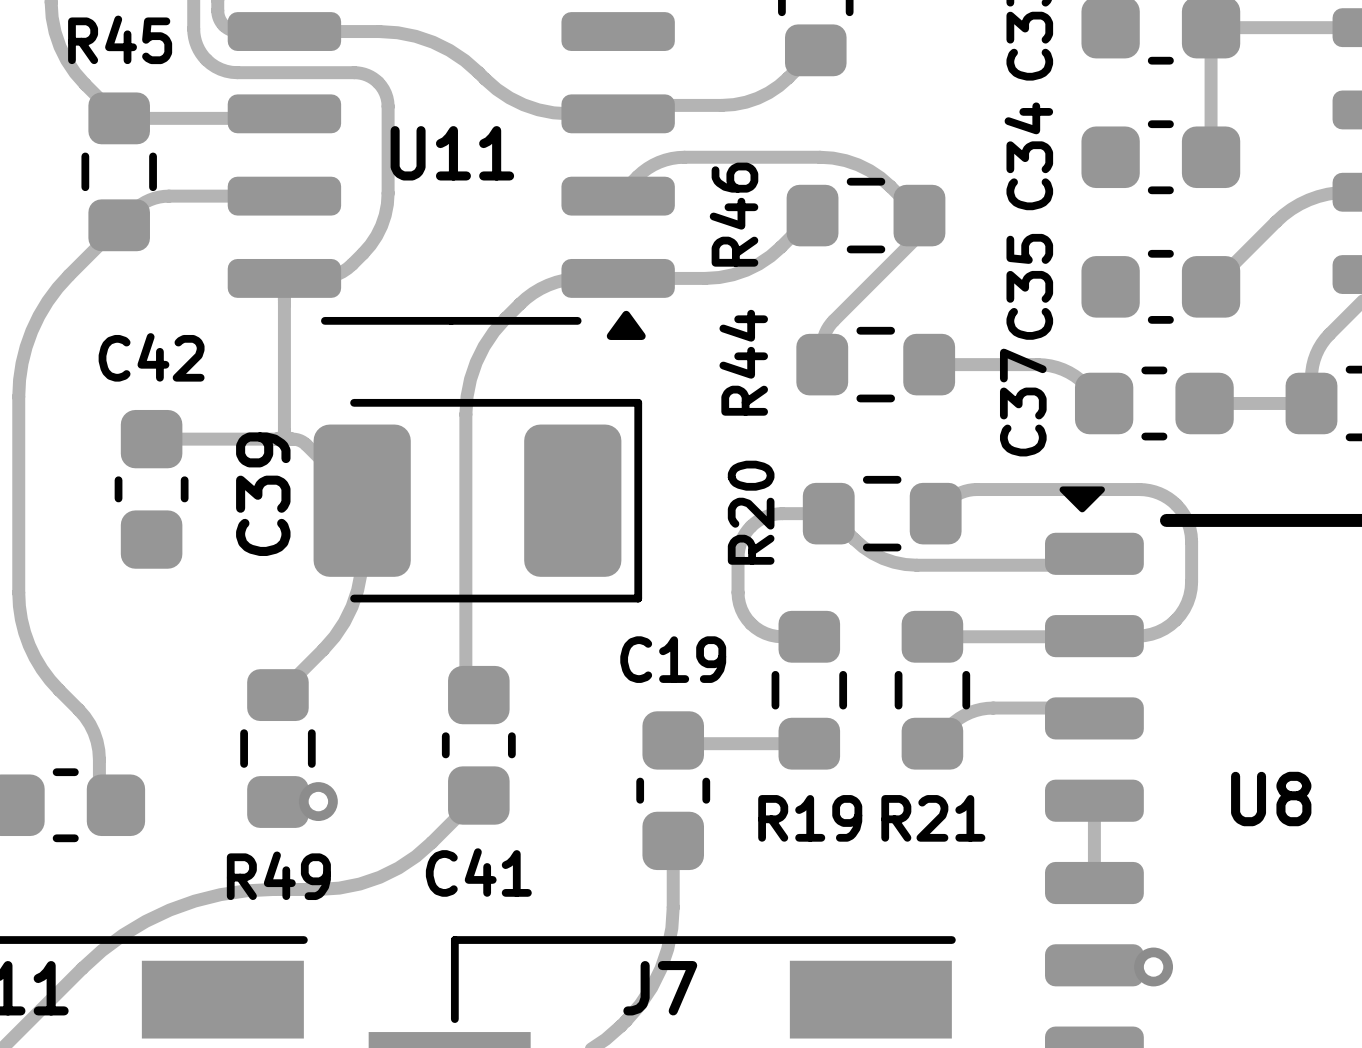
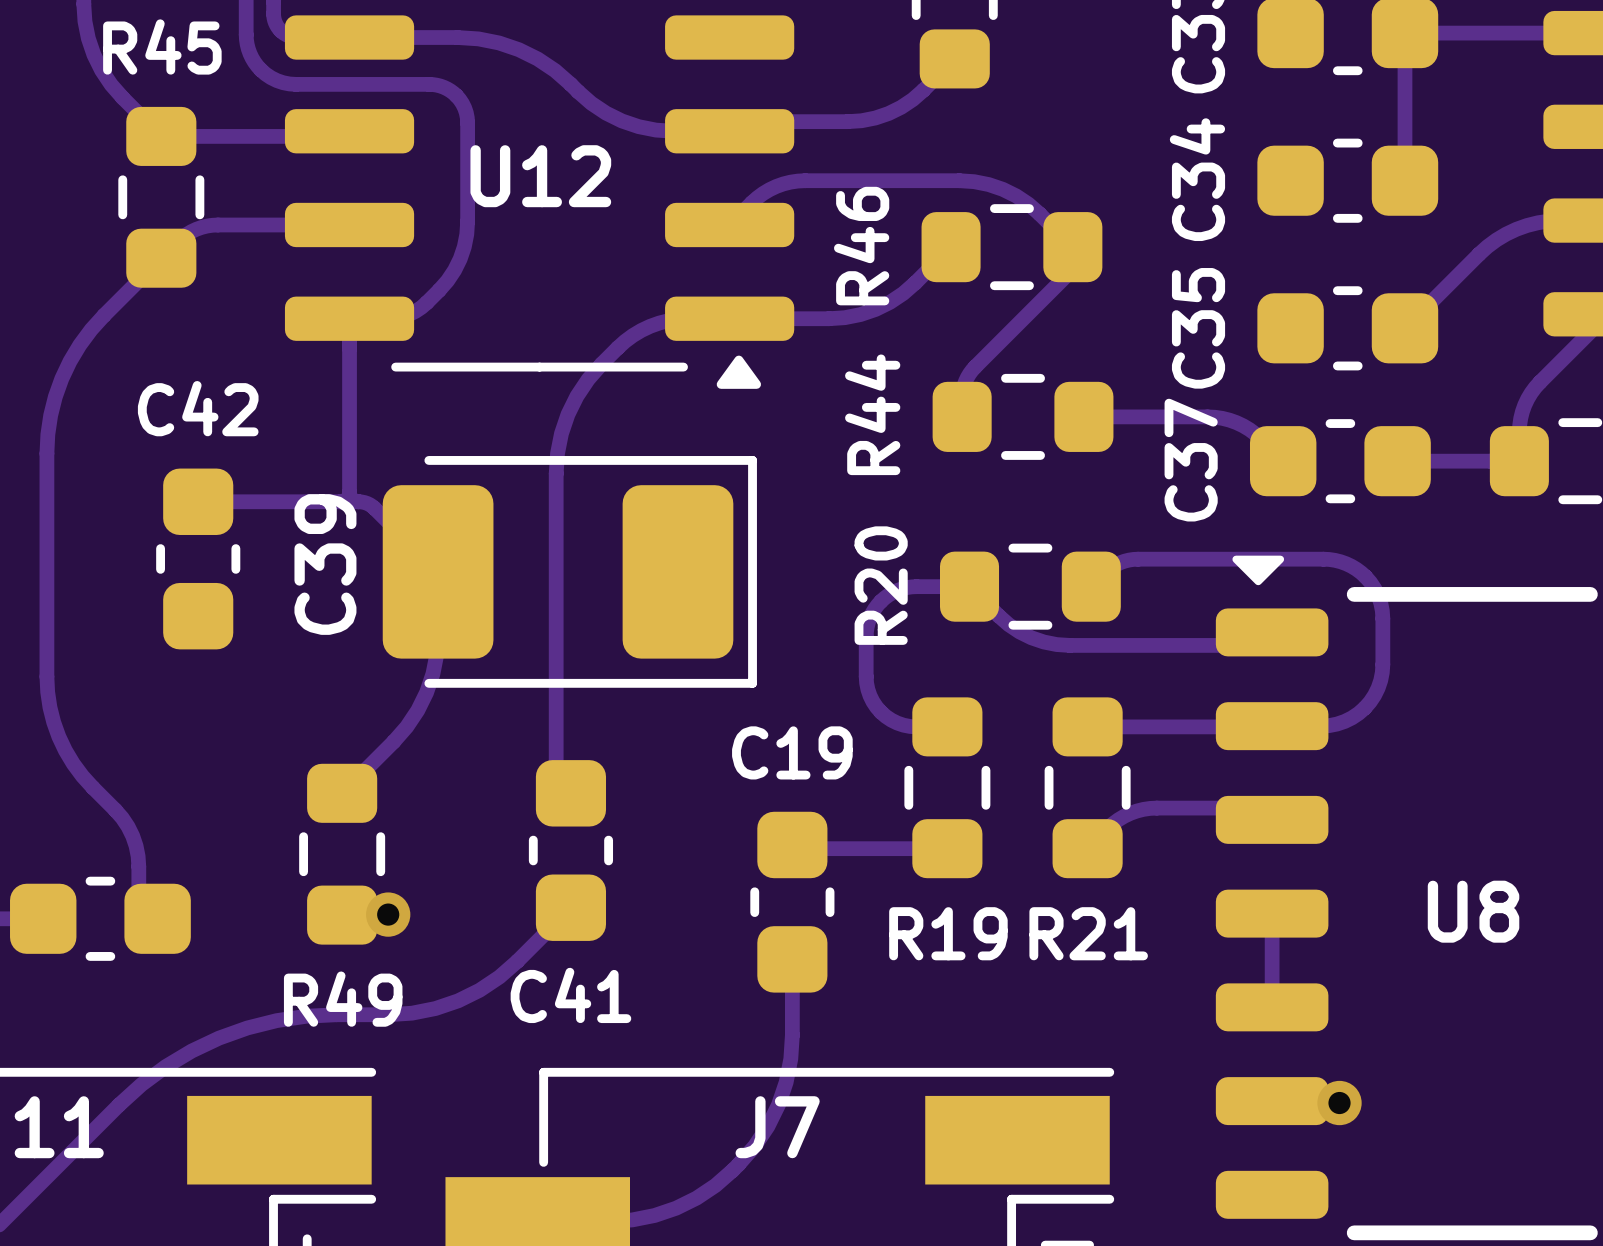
U11 name: U11 (452, 153) -> U12 (540, 176)

